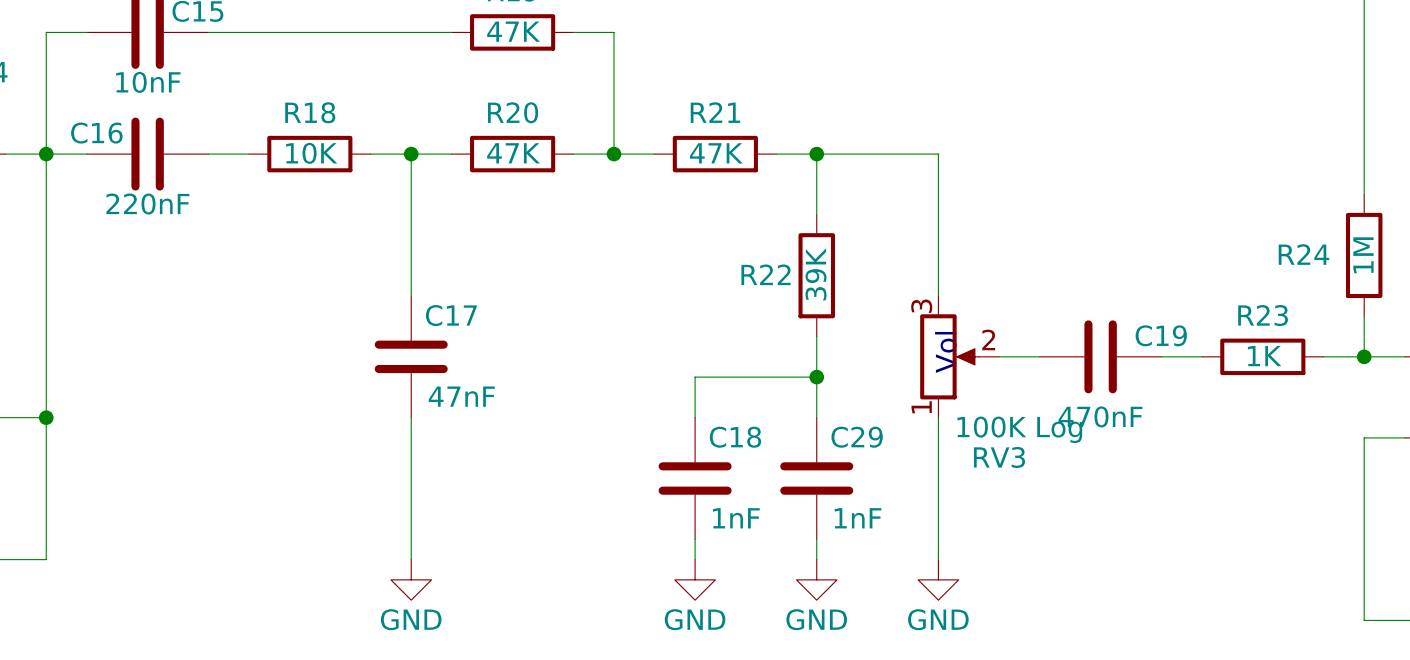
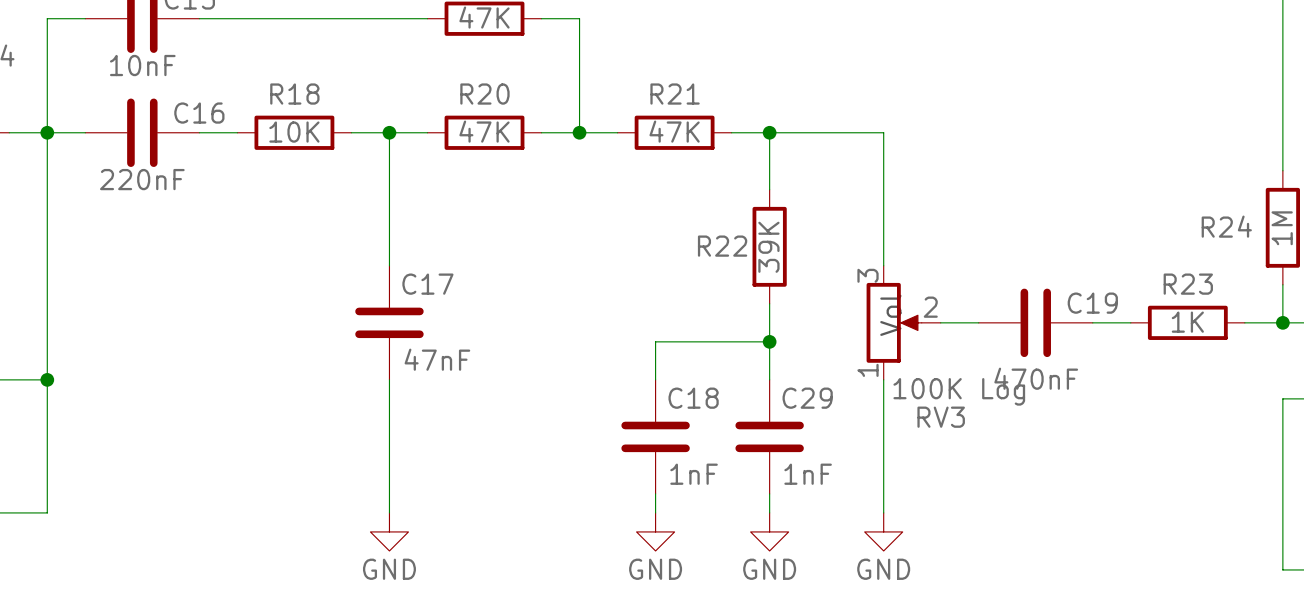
C16 name position: C16 (96, 133) -> C16 (199, 113)

